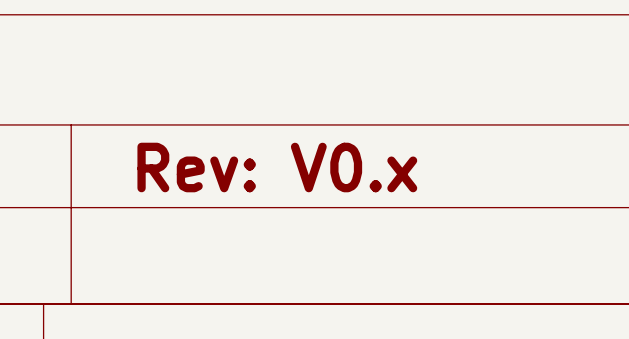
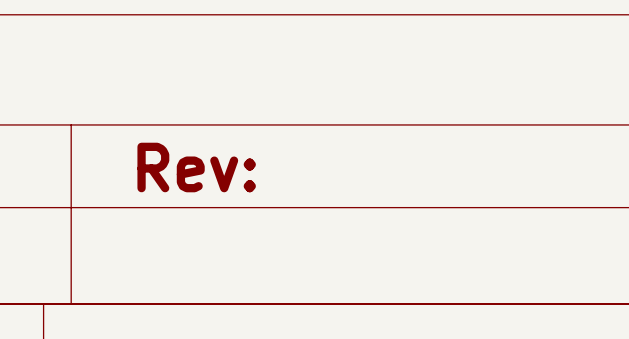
title block: Rev: V0.x (277, 167) -> Rev: (196, 167)

